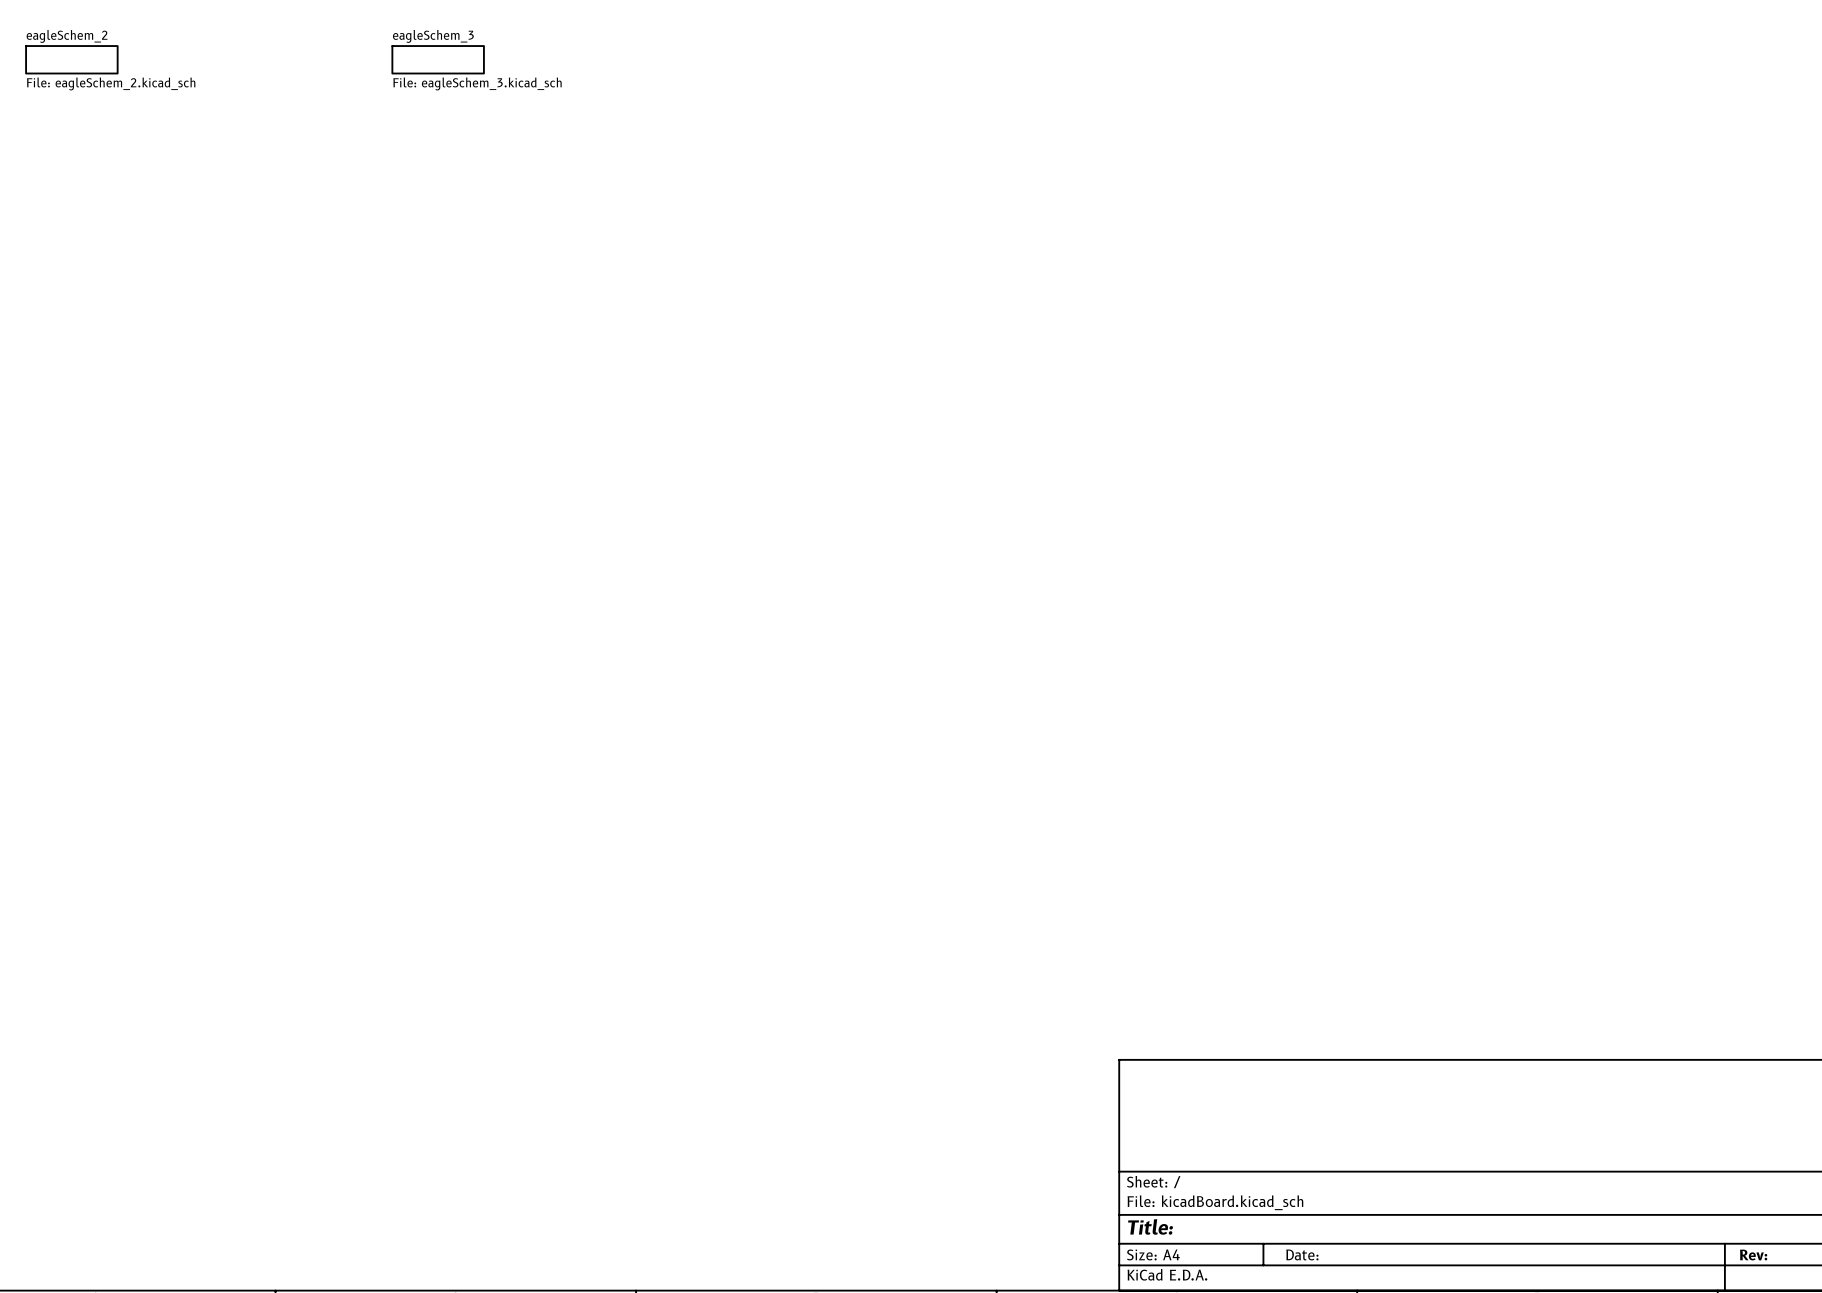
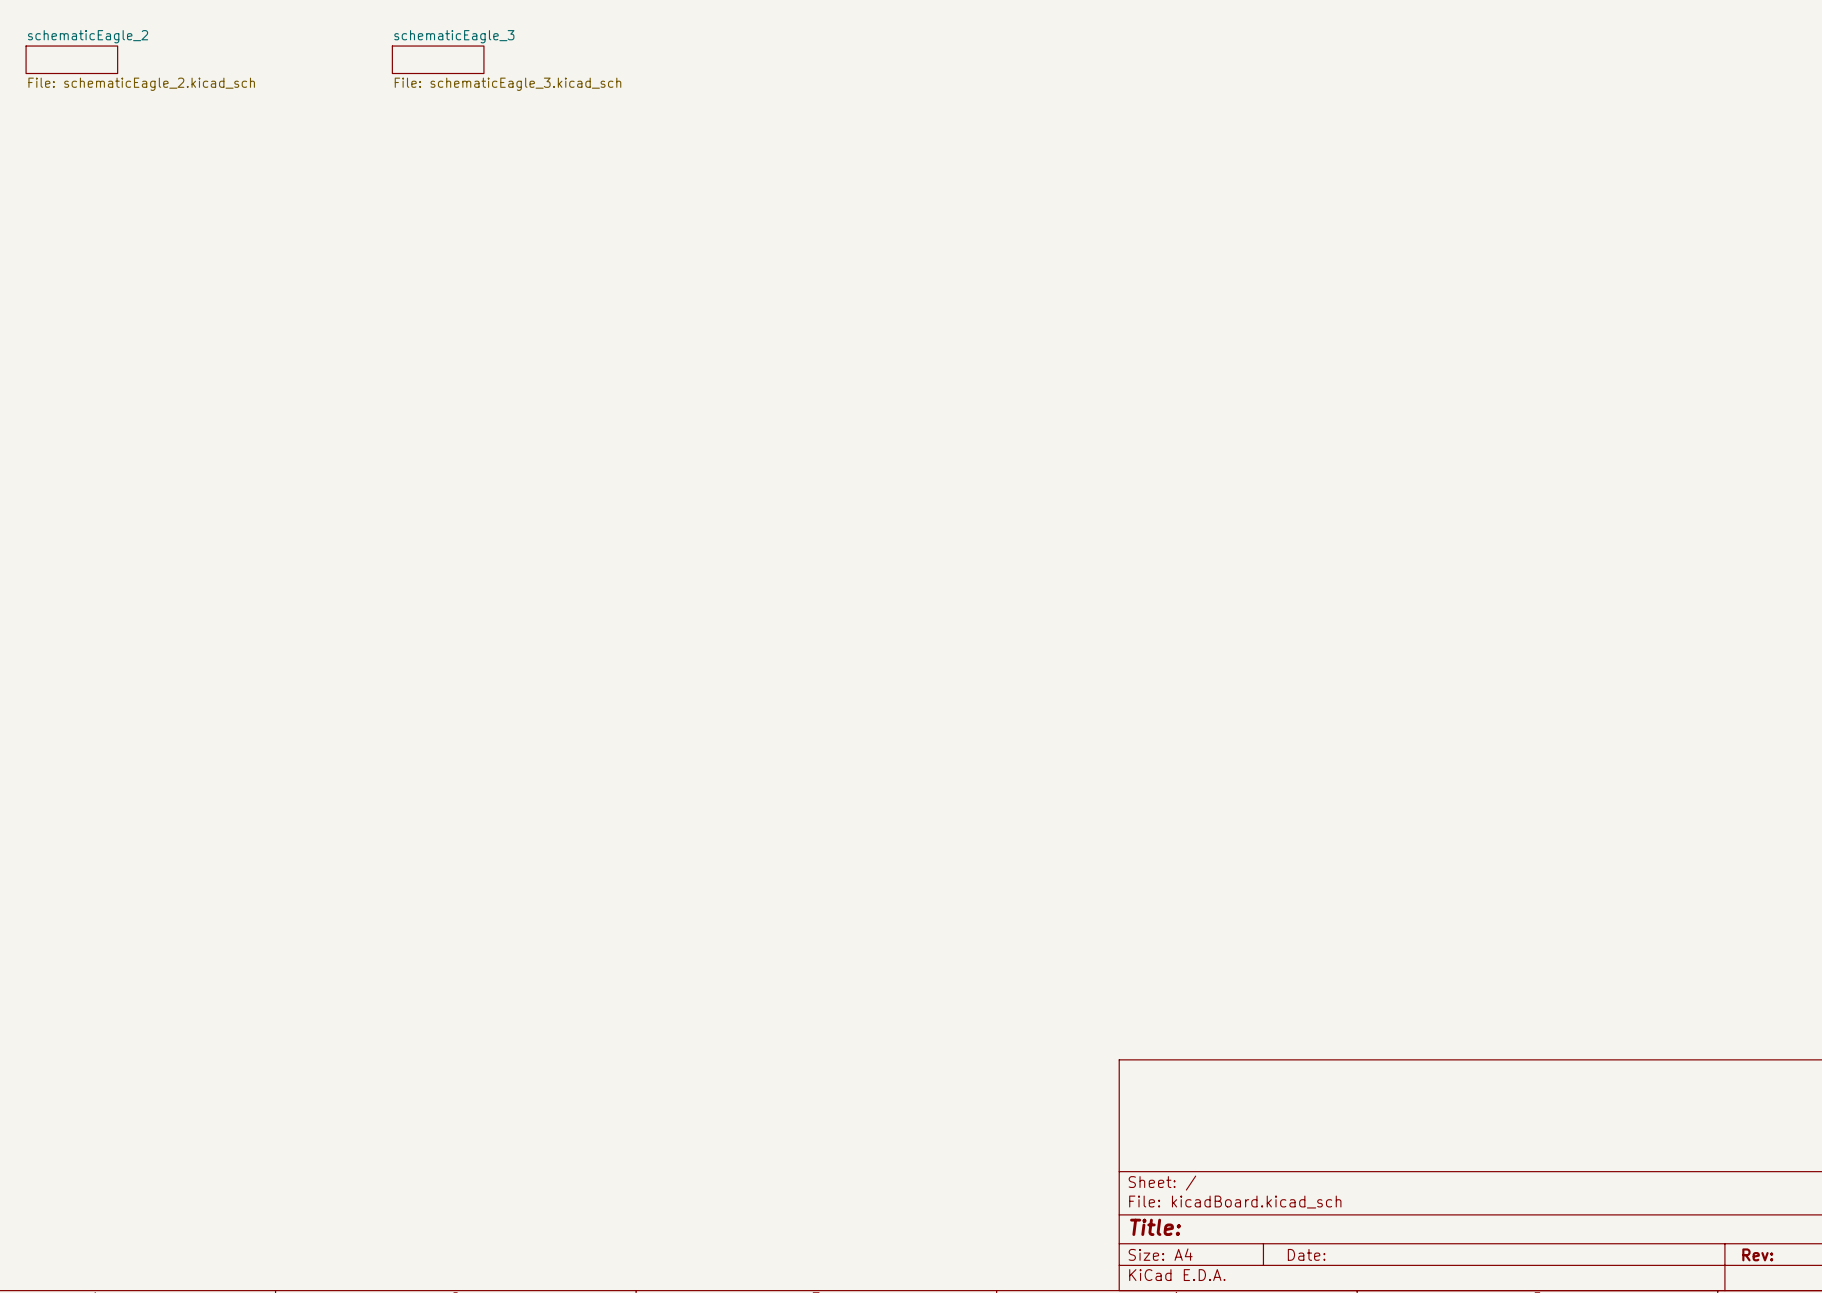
sheet eagleSchem_2 name: eagleSchem_2 (67, 36) -> schematicEagle_2 (88, 36)
sheet eagleSchem_3 name: eagleSchem_3 (433, 36) -> schematicEagle_3 (454, 36)
sheet eagleSchem_2 value: File: eagleSchem_2.kicad_sch (111, 83) -> File: schematicEagle_2.kicad_sch (141, 84)
sheet eagleSchem_3 value: File: eagleSchem_3.kicad_sch (477, 83) -> File: schematicEagle_3.kicad_sch (508, 84)

